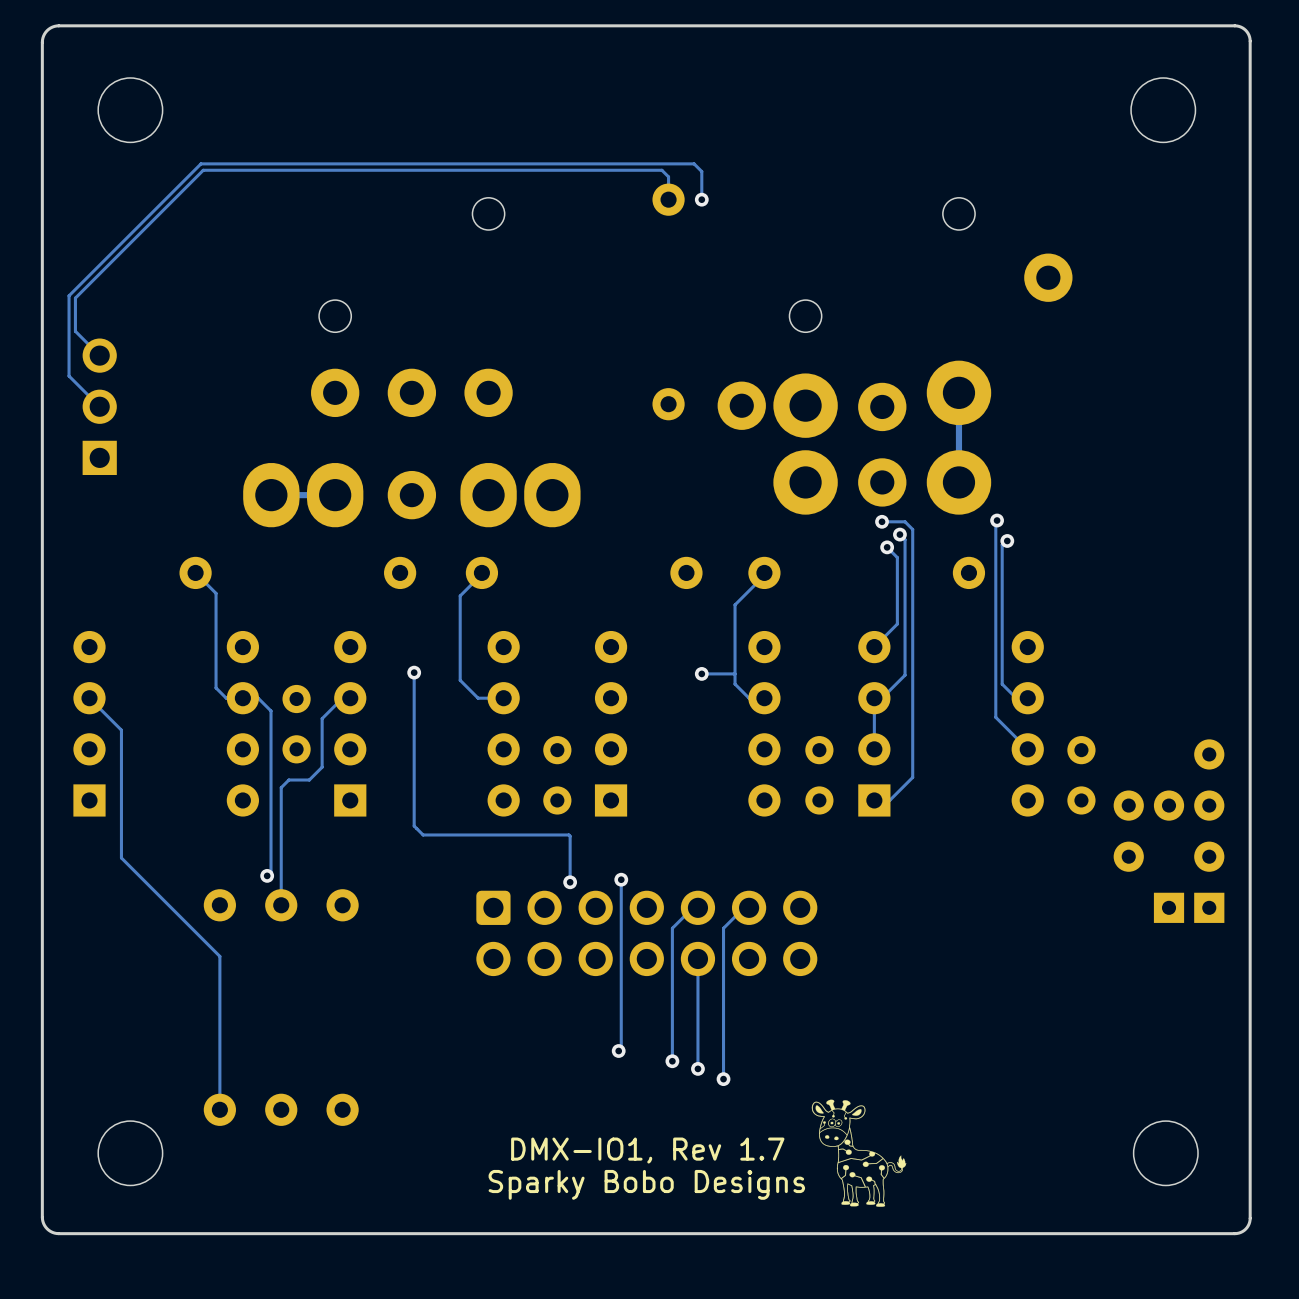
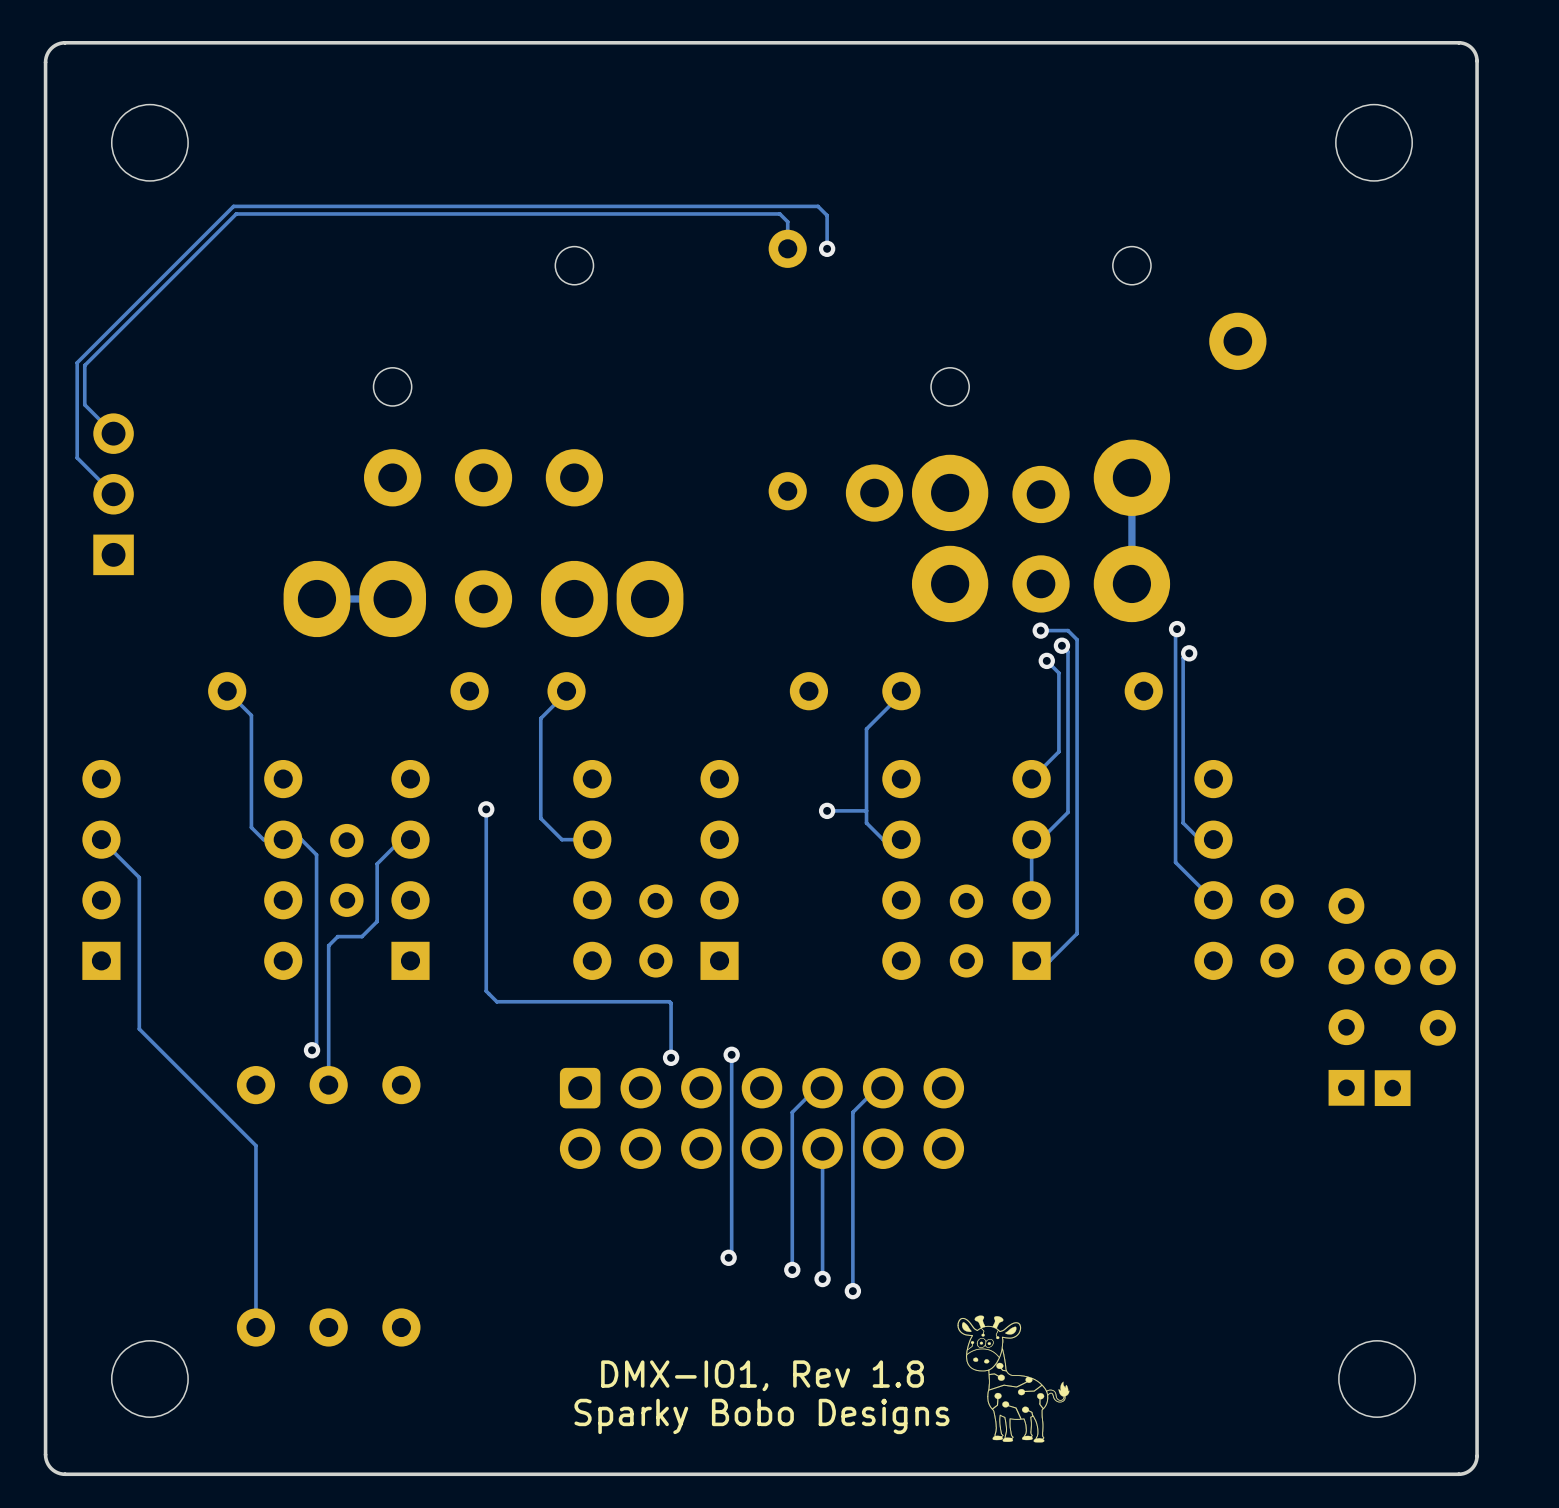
part footprint: [1113, 739, 1225, 923] -> [1328, 888, 1456, 1107]
text: DMX-IO1, Rev 1.7 (647, 1150) -> DMX-IO1, Rev 1.8 (762, 1375)

